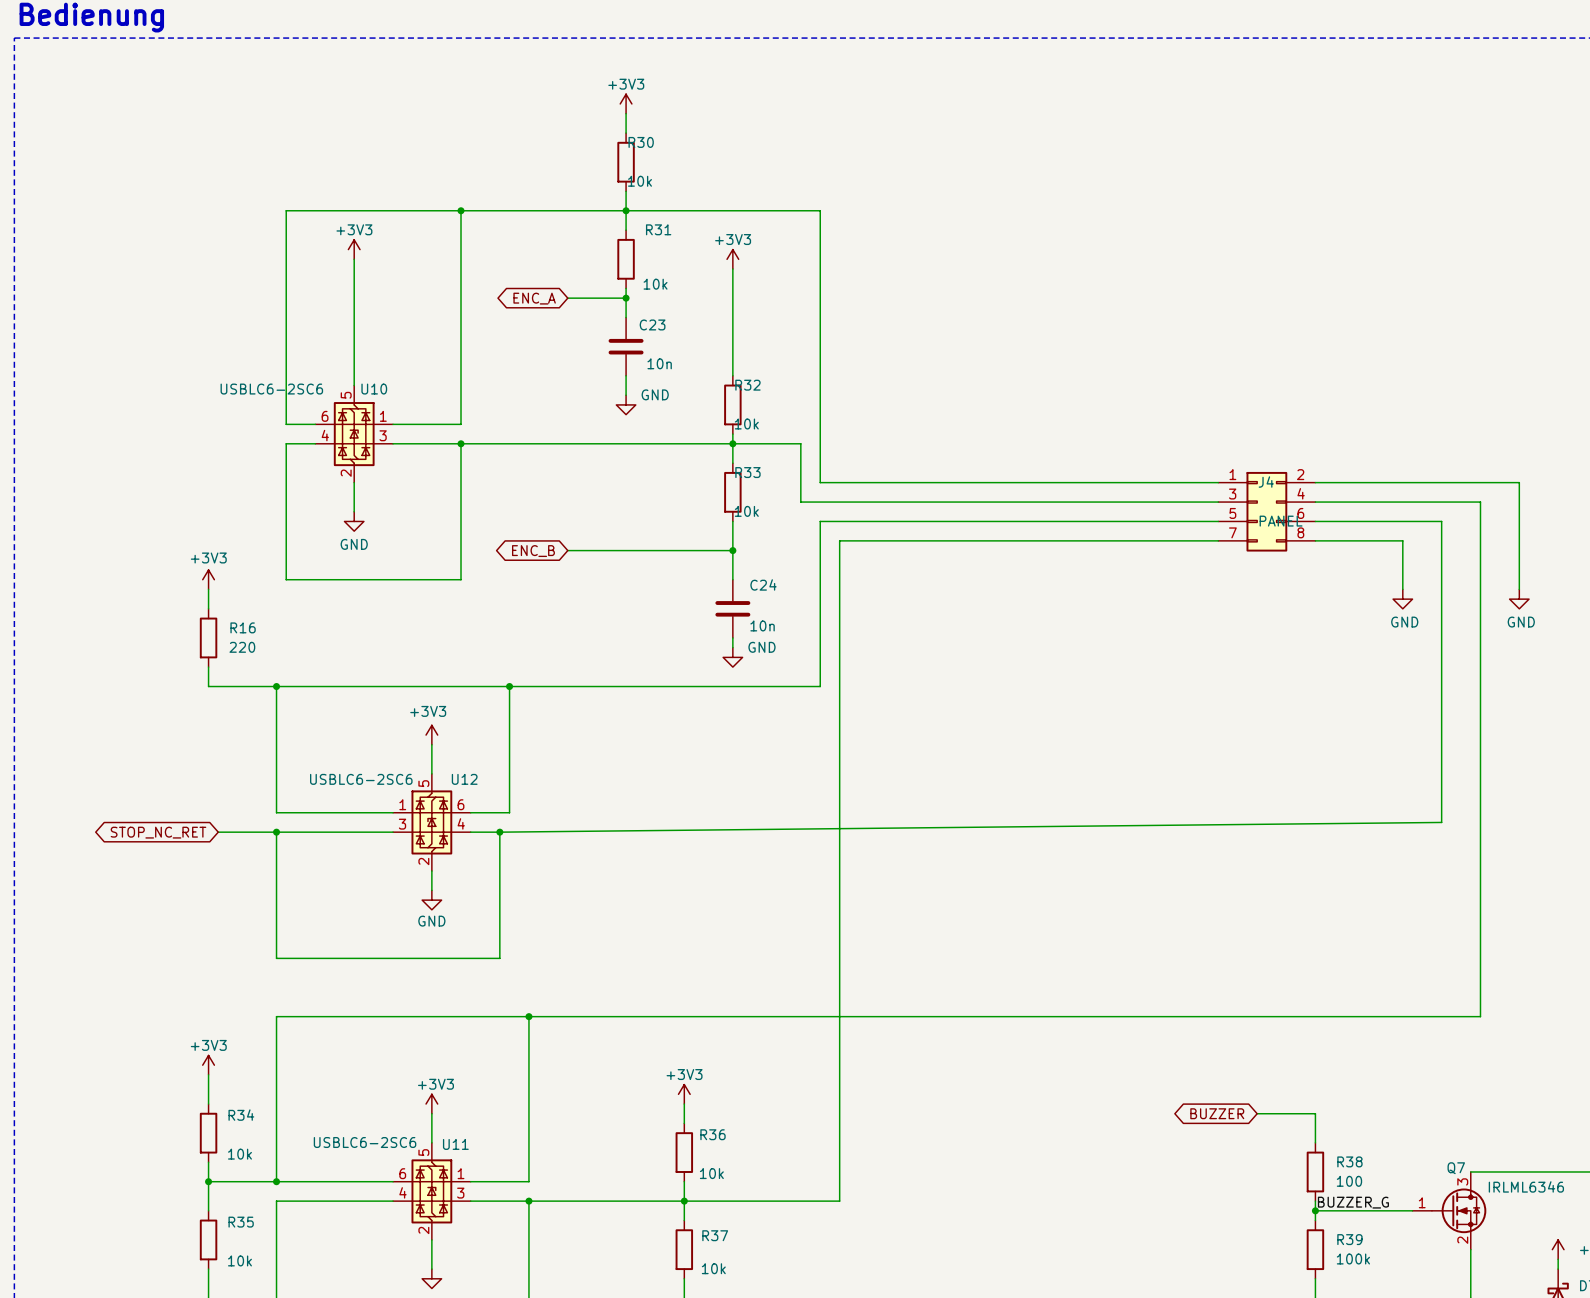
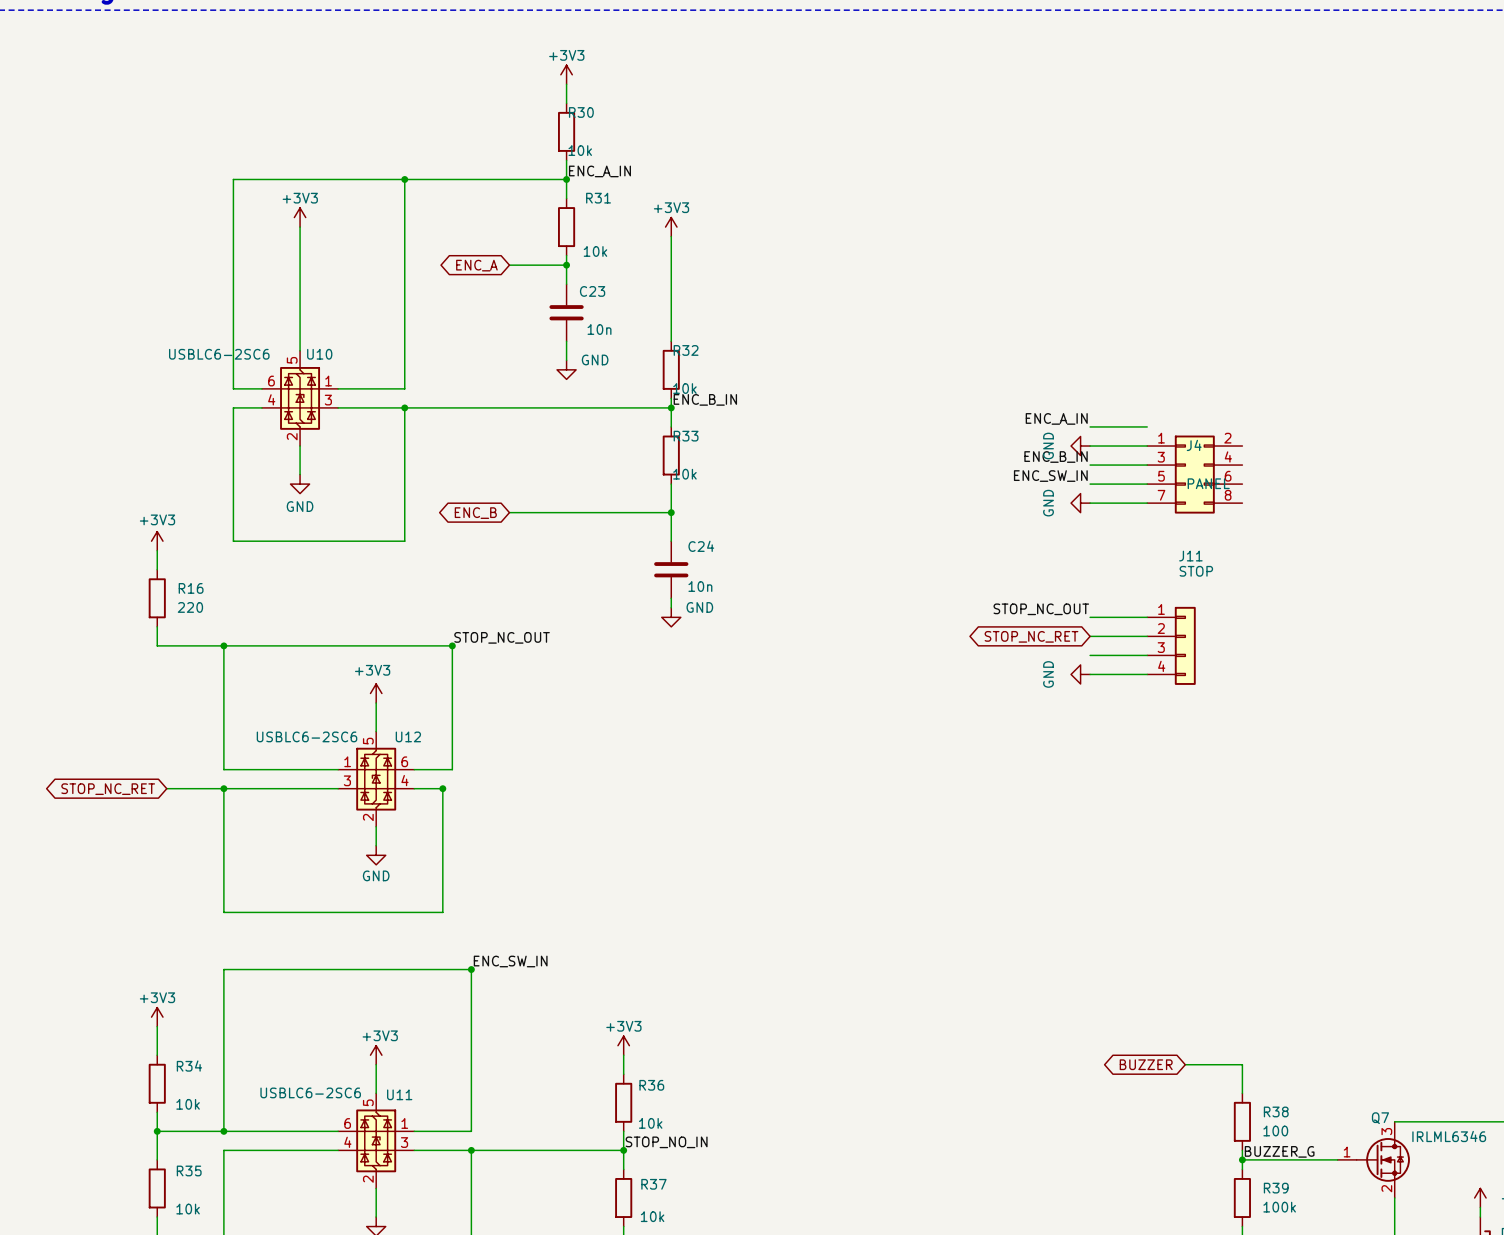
label: none -> ENC_A_IN (599, 171)
wire: (626, 210) (820, 210) (820, 482) (1160, 482) -> none
label: none -> ENC_B_IN (705, 399)
wire: (732, 443) (800, 443) (800, 502) (1160, 502) -> none
label: none -> ENC_A_IN (1056, 418)
wire: none -> (1090, 426) (1147, 426)
power symbol: none -> GND (1080, 446)
wire: (1315, 482) (1519, 482) (1519, 589) -> none
label: none -> ENC_B_IN (1056, 457)
wire: (1315, 502) (1480, 502) (1480, 1016) (528, 1016) -> none
label: none -> ENC_SW_IN (1050, 476)
wire: (1160, 521) (820, 521) (820, 686) (509, 686) -> none
wire: (1315, 521) (1441, 521) (1441, 822) (499, 832) -> none
power symbol: none -> GND (1080, 503)
wire: (1160, 540) (839, 540) (839, 1201) (684, 1201) -> none
wire: (1315, 540) (1402, 540) (1402, 589) -> none
power symbol: GND (1402, 599) -> none
power symbol: GND (1519, 599) -> none
label: none -> STOP_NC_OUT (1041, 609)
wire: none -> (1090, 617) (1147, 617)
wire: none -> (1090, 636) (1147, 636)
global label: none -> STOP_NC_RET (1031, 636)
label: none -> STOP_NC_OUT (502, 637)
J11: none -> STOP (1171, 645)
wire: none -> (1090, 655) (1147, 655)
power symbol: none -> GND (1080, 674)
wire: none -> (1090, 674) (1147, 674)
label: none -> ENC_SW_IN (510, 961)
label: none -> STOP_NO_IN (666, 1142)

